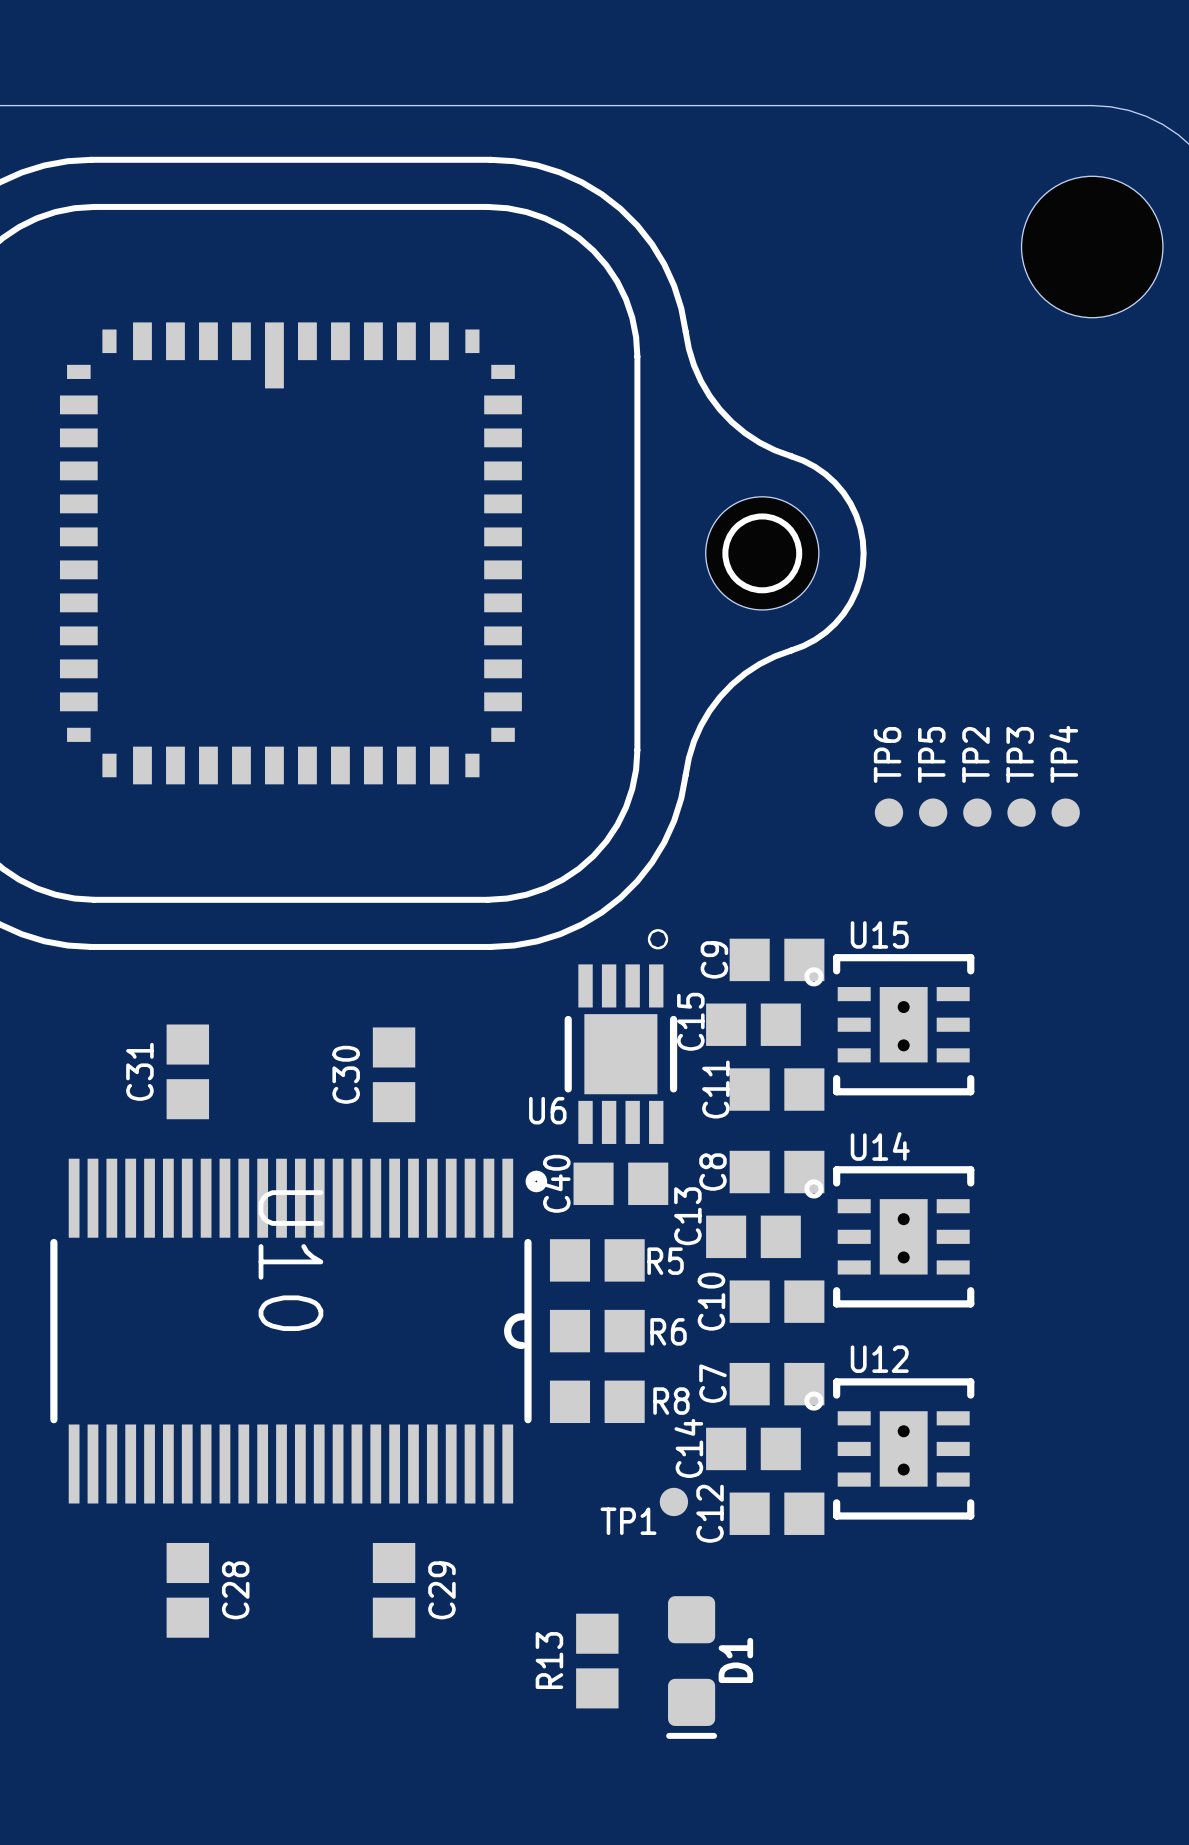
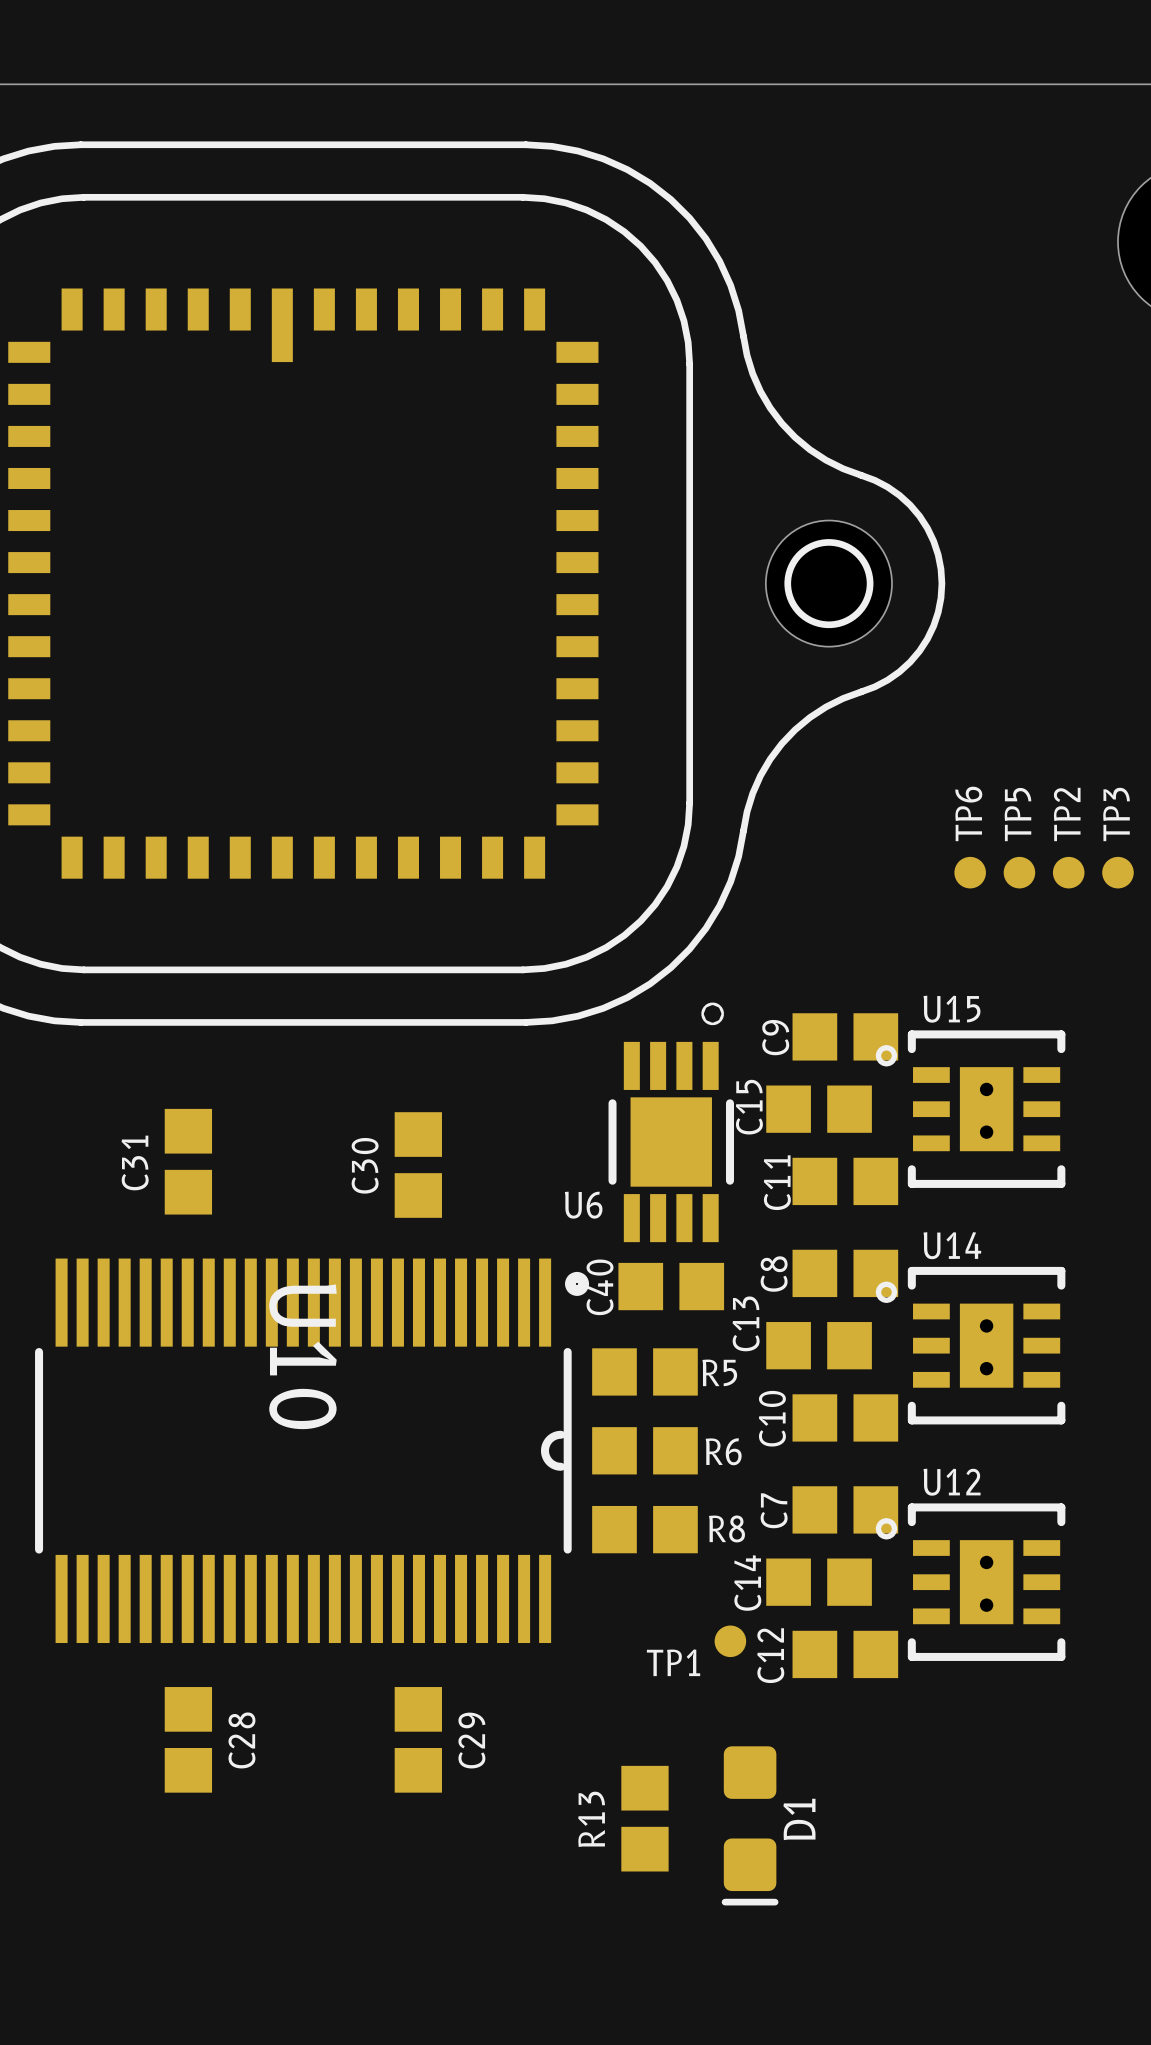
part footprint: [59, 322, 522, 785] -> [8, 288, 599, 879]

